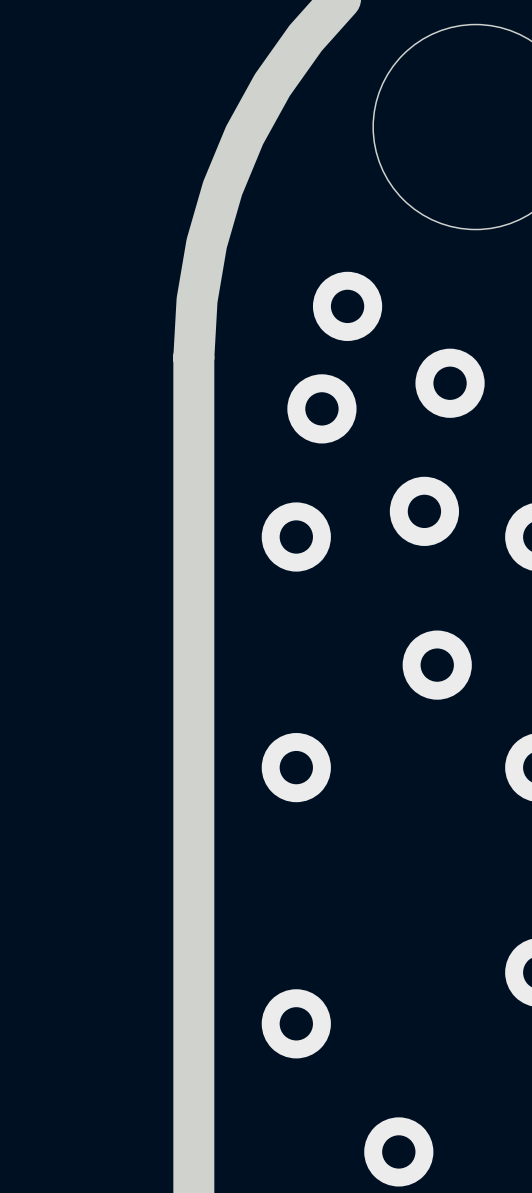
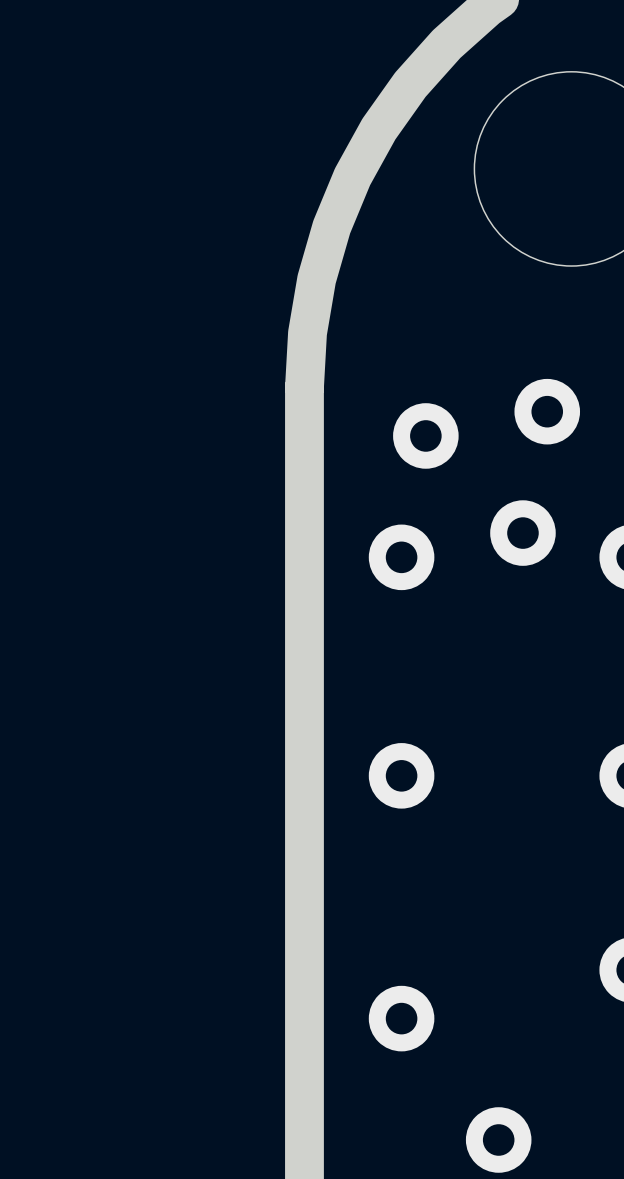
via: (347, 306) -> none
via: (437, 665) -> none

